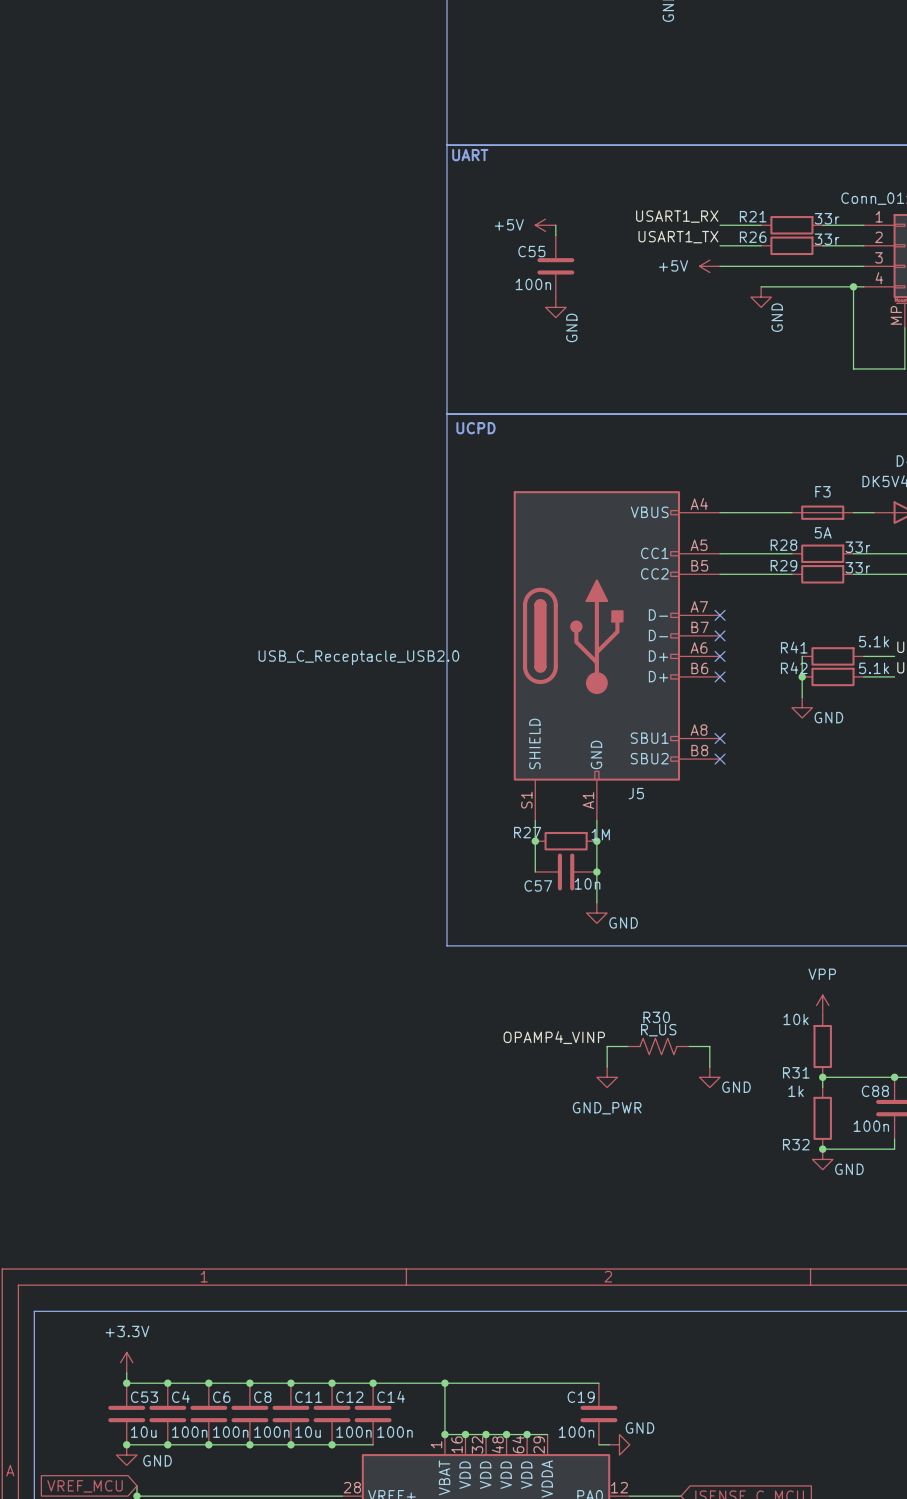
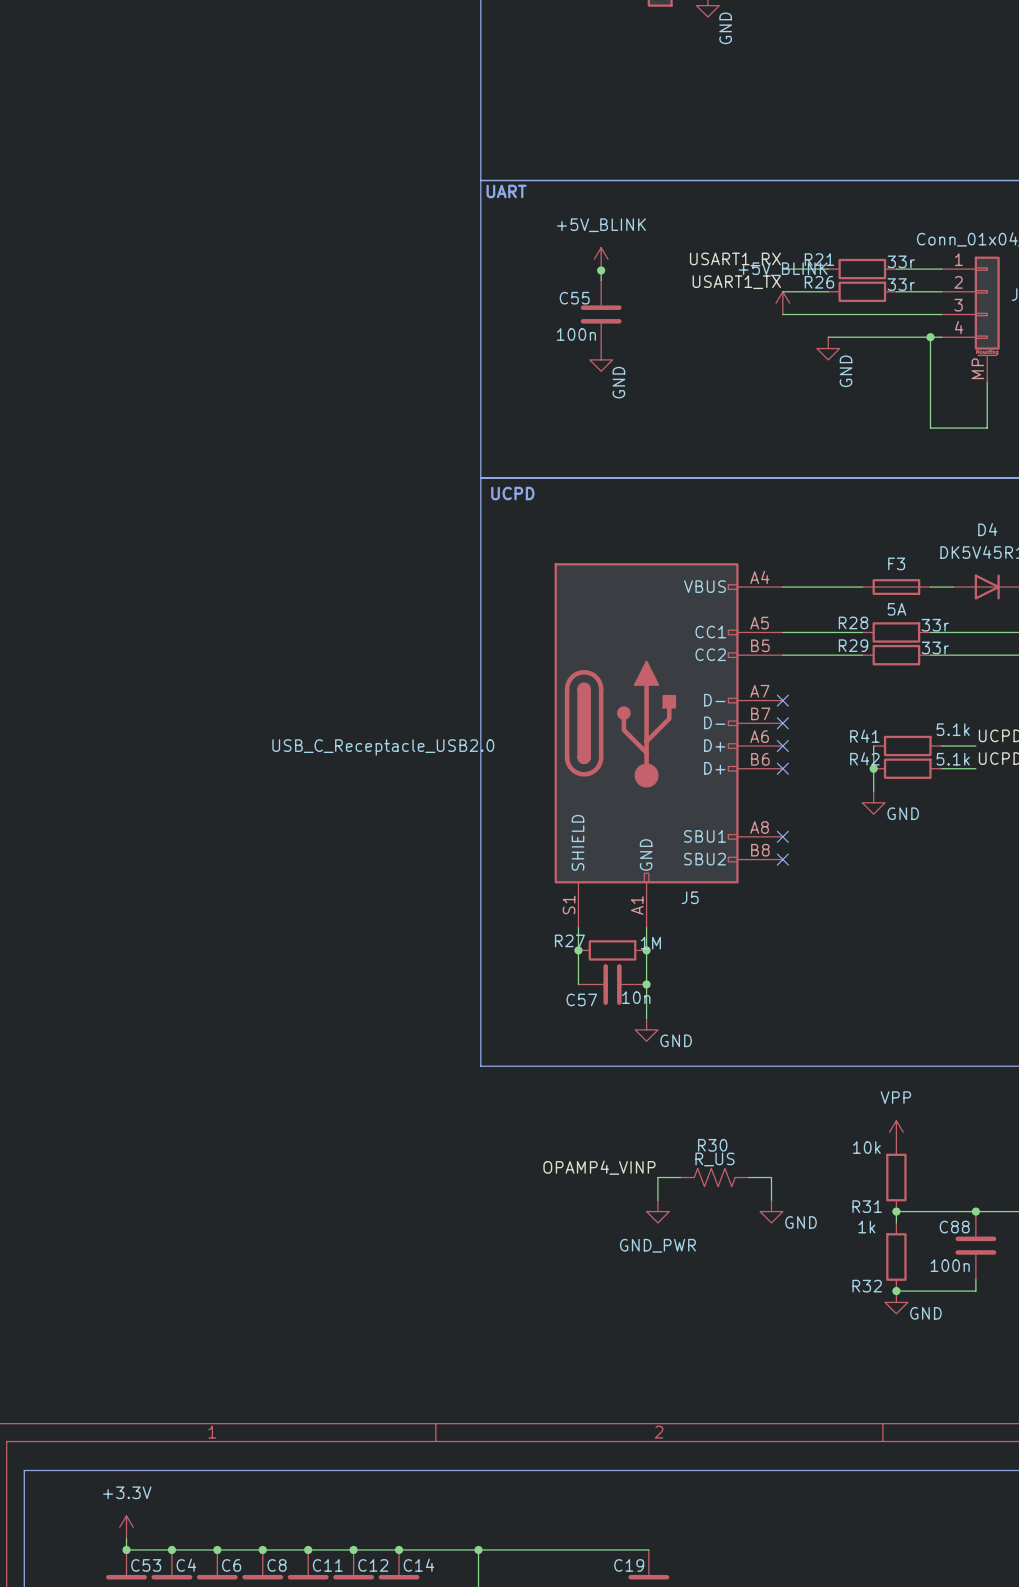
power symbol: none -> +5V_BLINK (601, 259)
power symbol: +5V (545, 225) -> none
junction: none -> (601, 270)
power symbol: none -> +5V_BLINK (782, 303)
power symbol: +5V (709, 266) -> none

